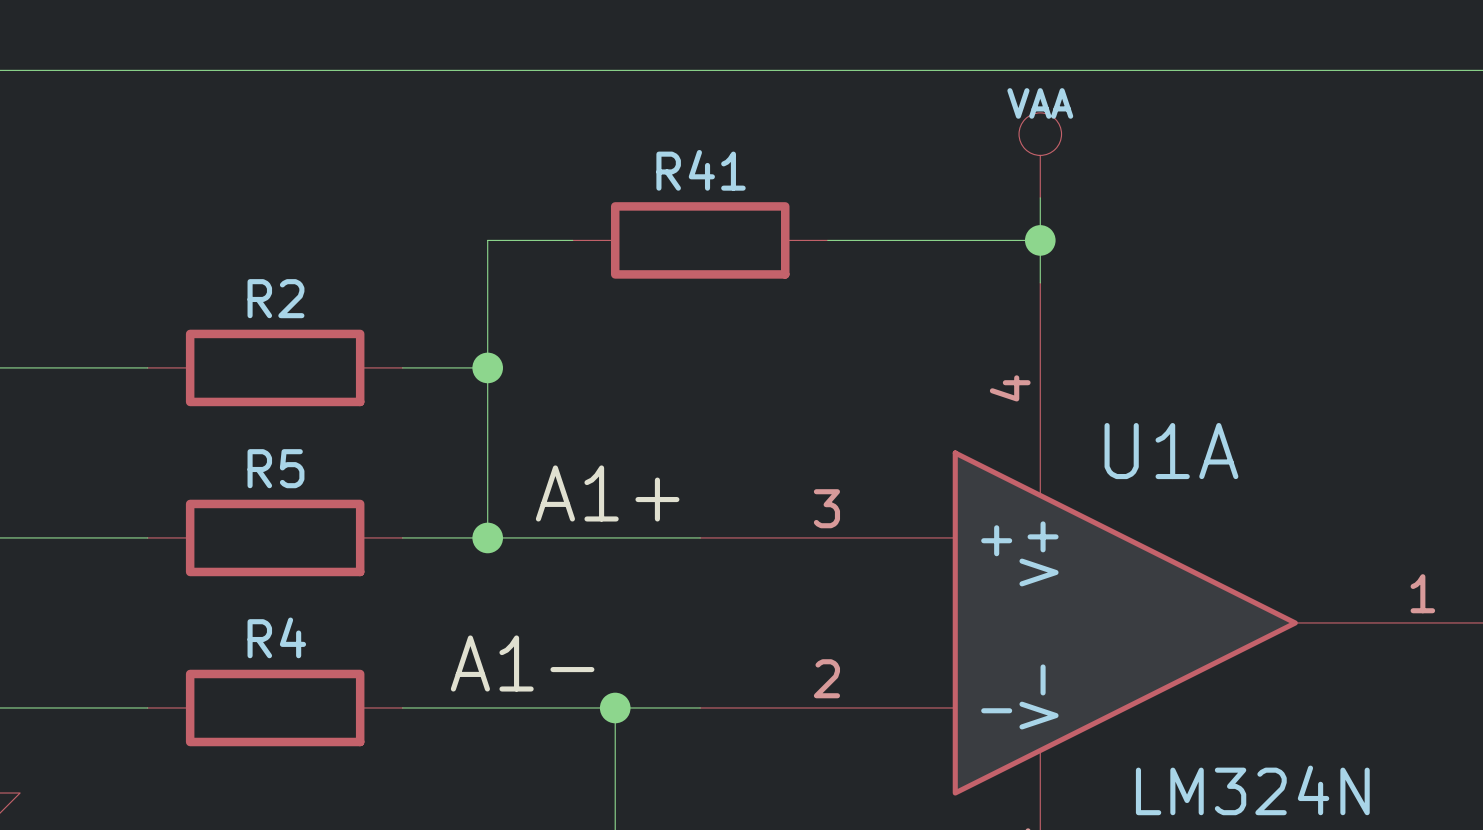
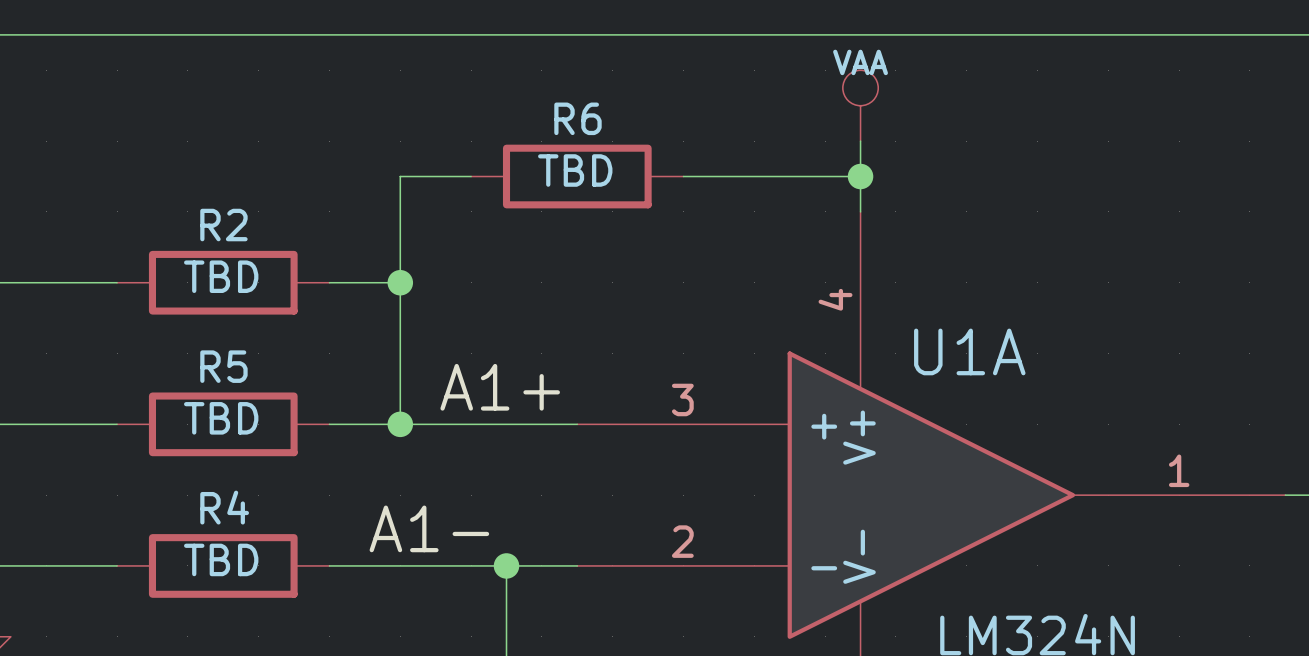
R41 name: R41 (701, 170) -> R6 (577, 118)
R41 value: none -> TBD (575, 170)
R2 value: none -> TBD (221, 276)
R5 value: none -> TBD (221, 418)
R4 value: none -> TBD (221, 559)

